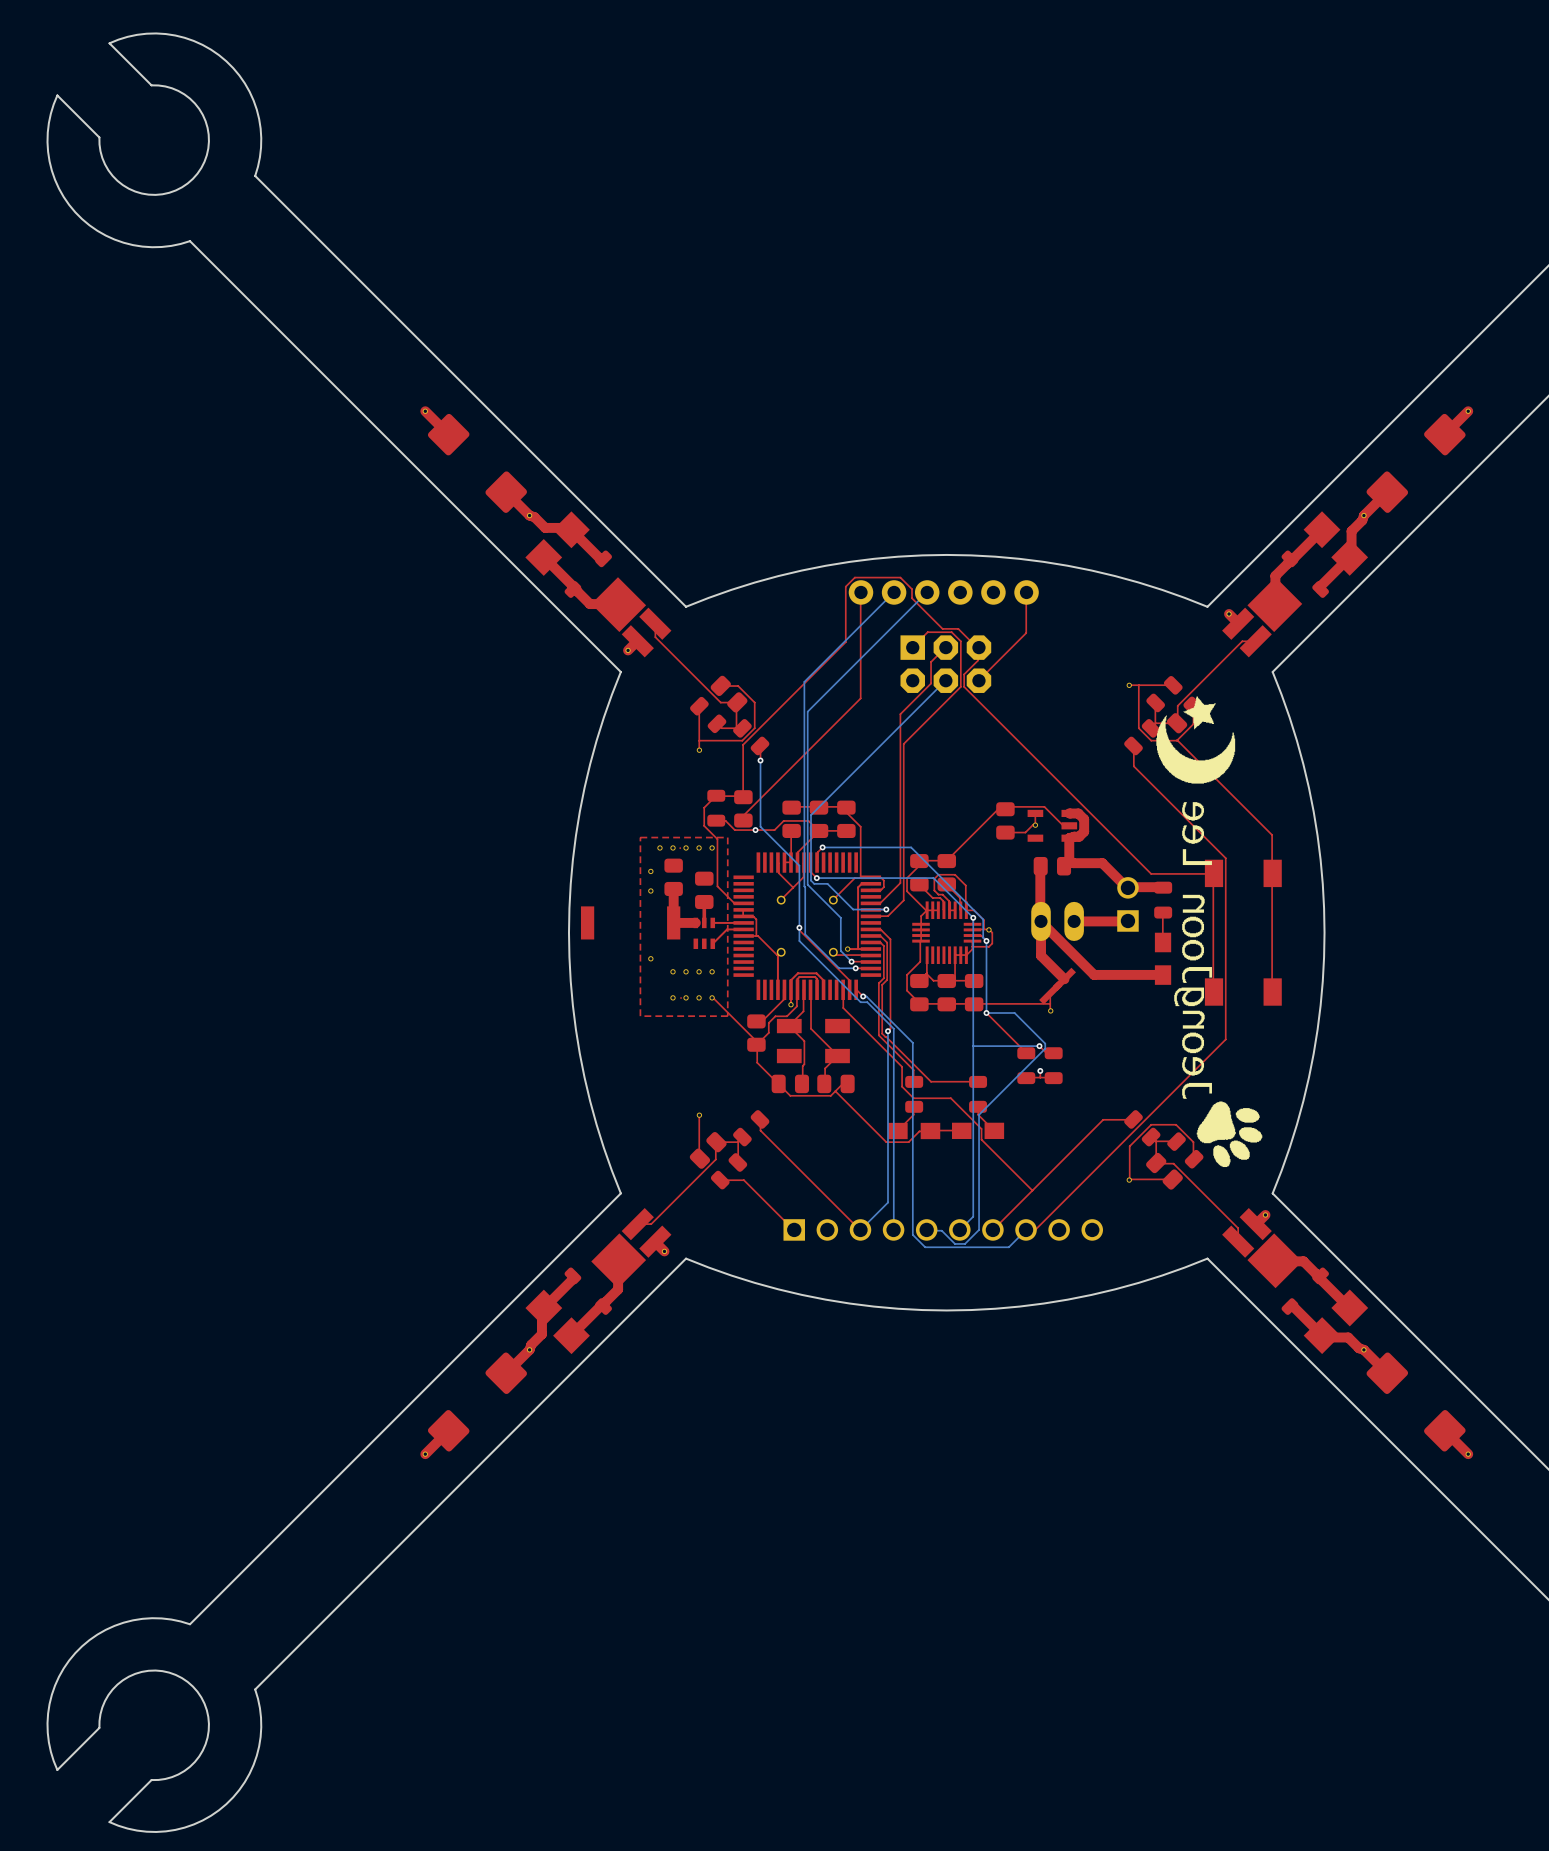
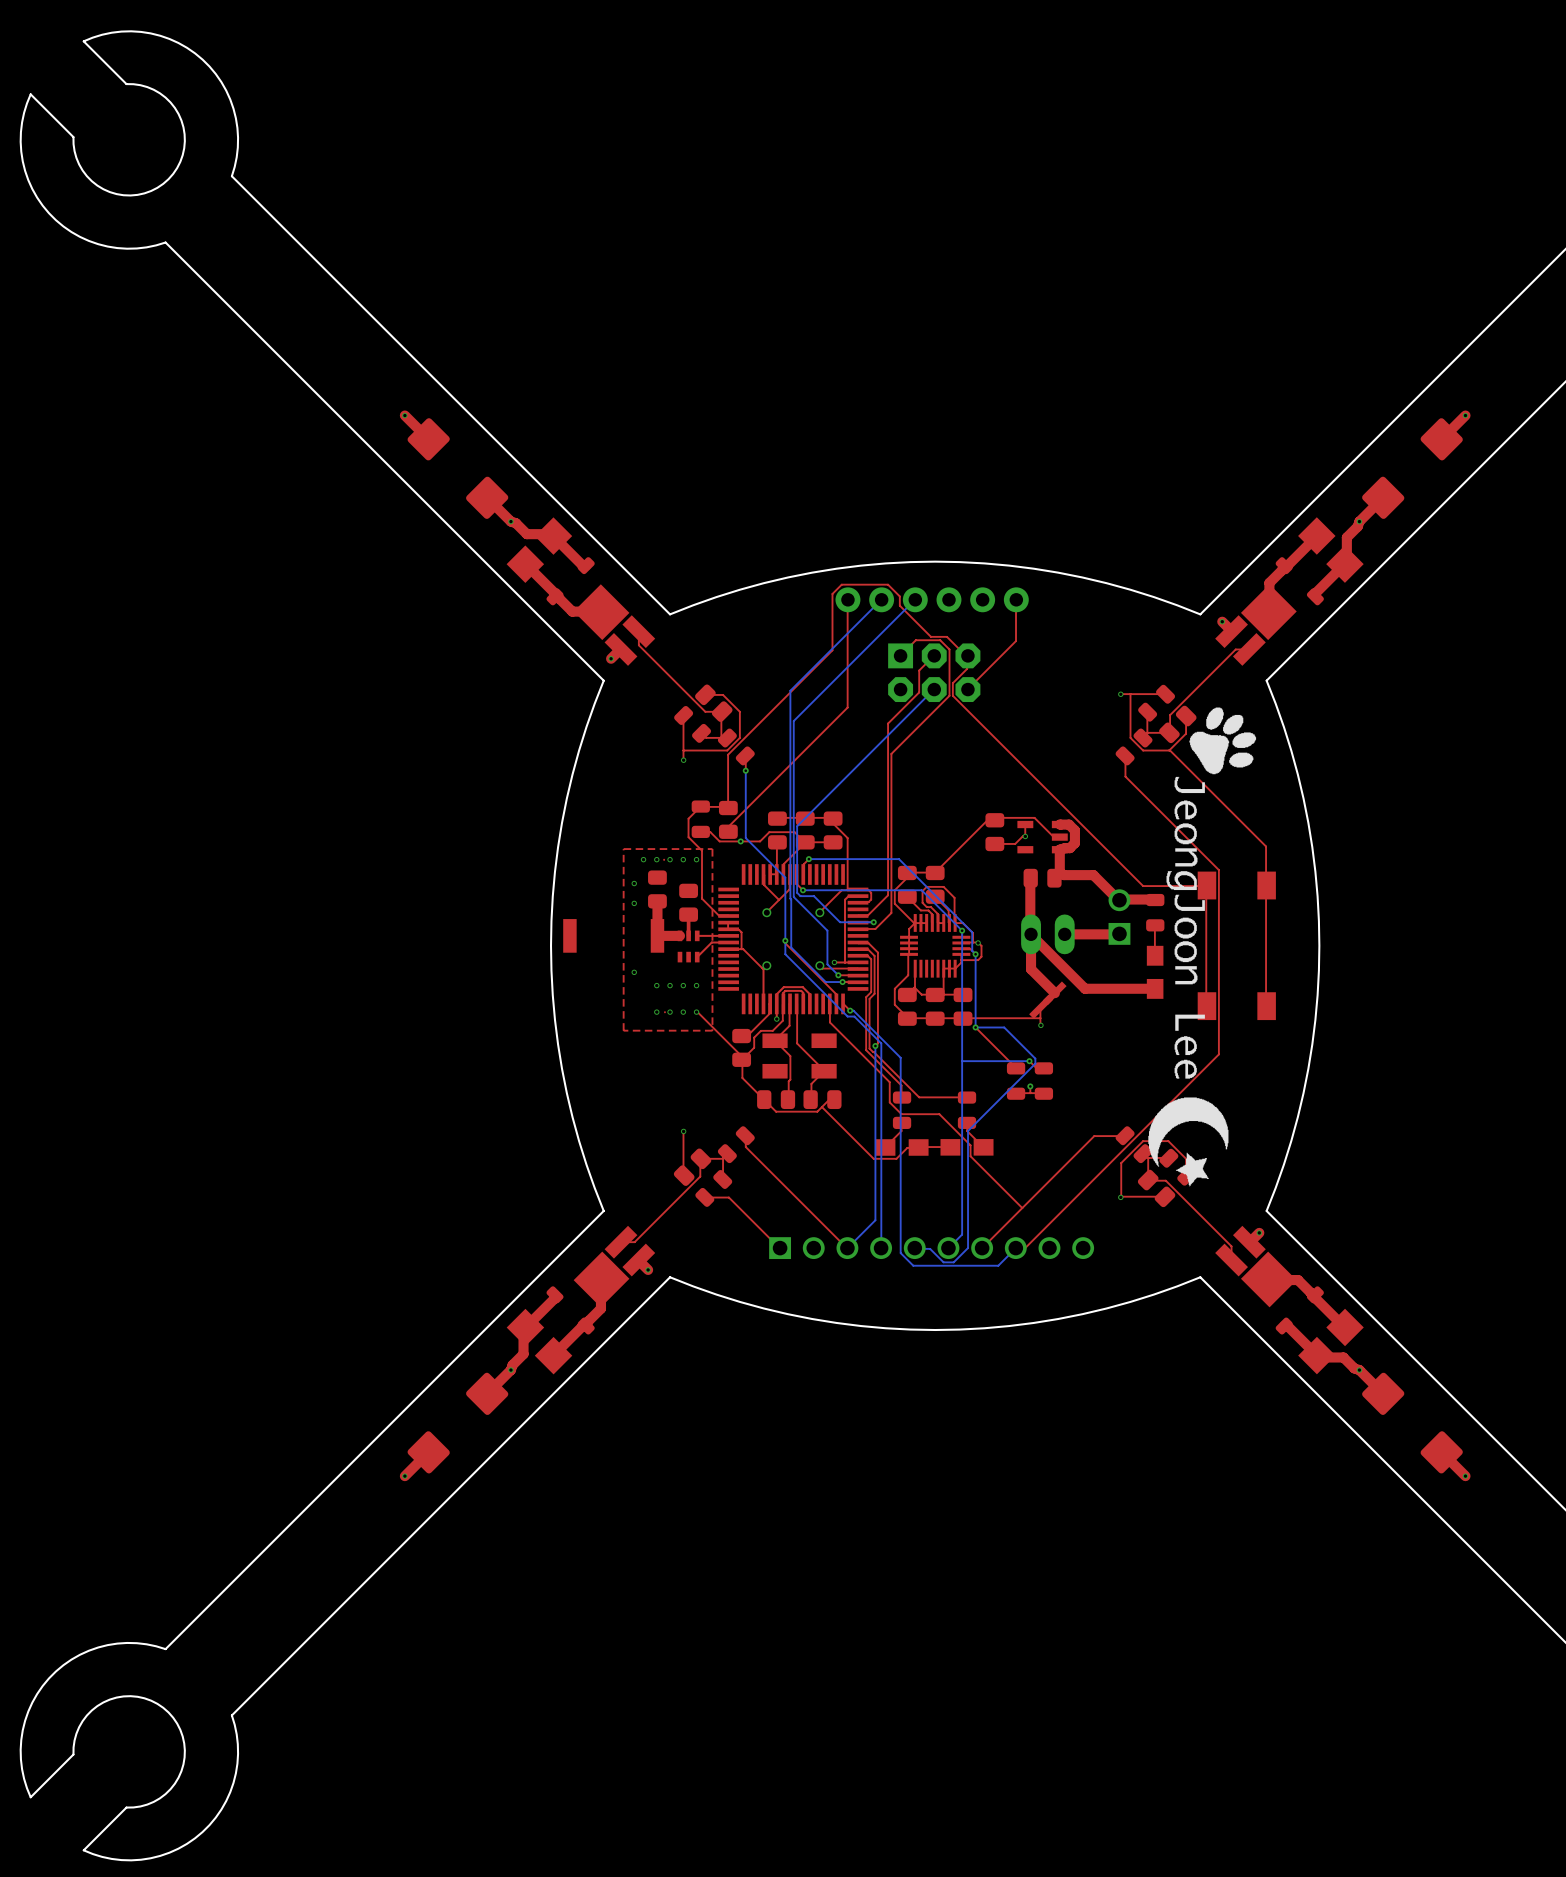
drawing shape: [1156, 696, 1263, 1168] -> [1148, 707, 1257, 1187]

